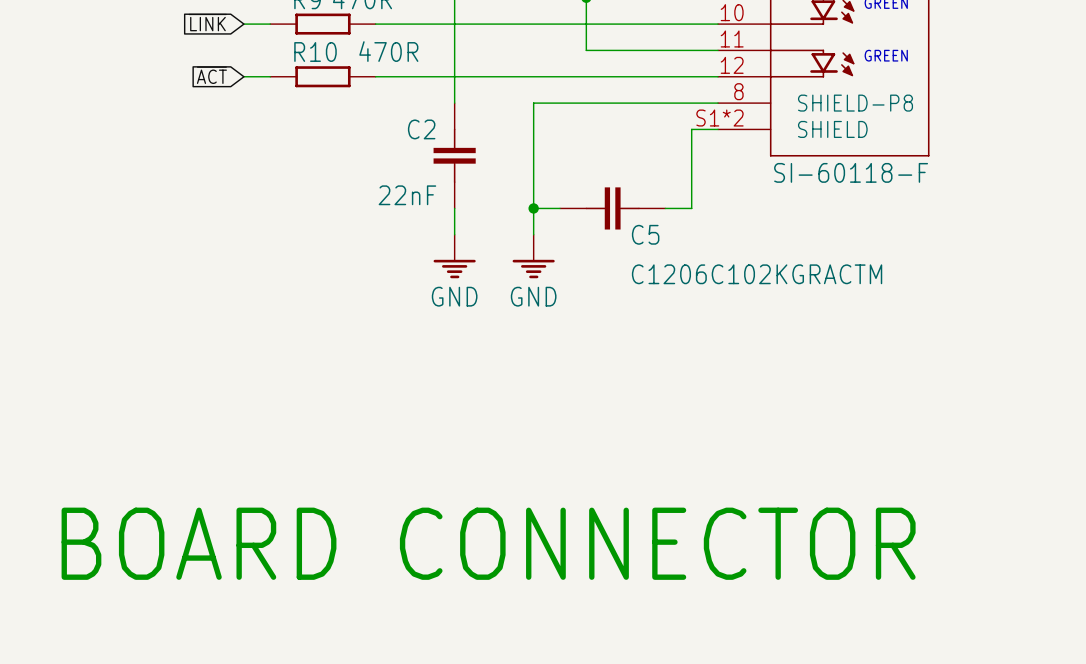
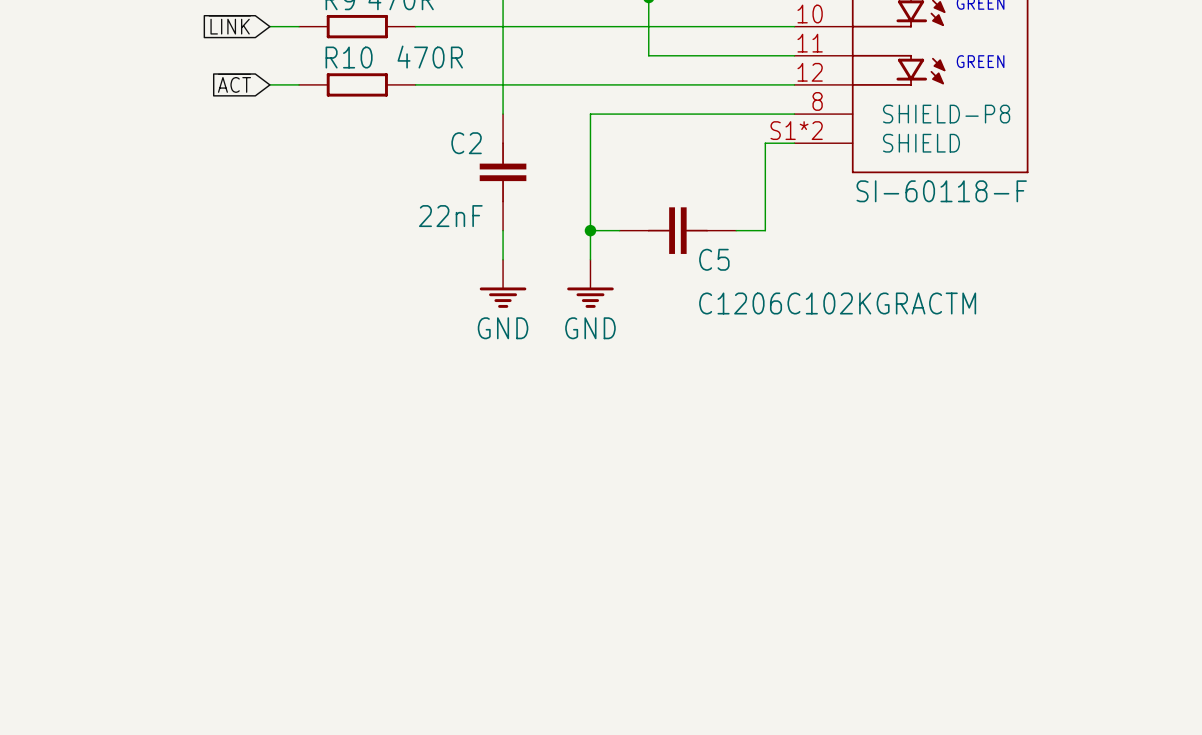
text: BOARD CONNECTOR (488, 543) -> none

